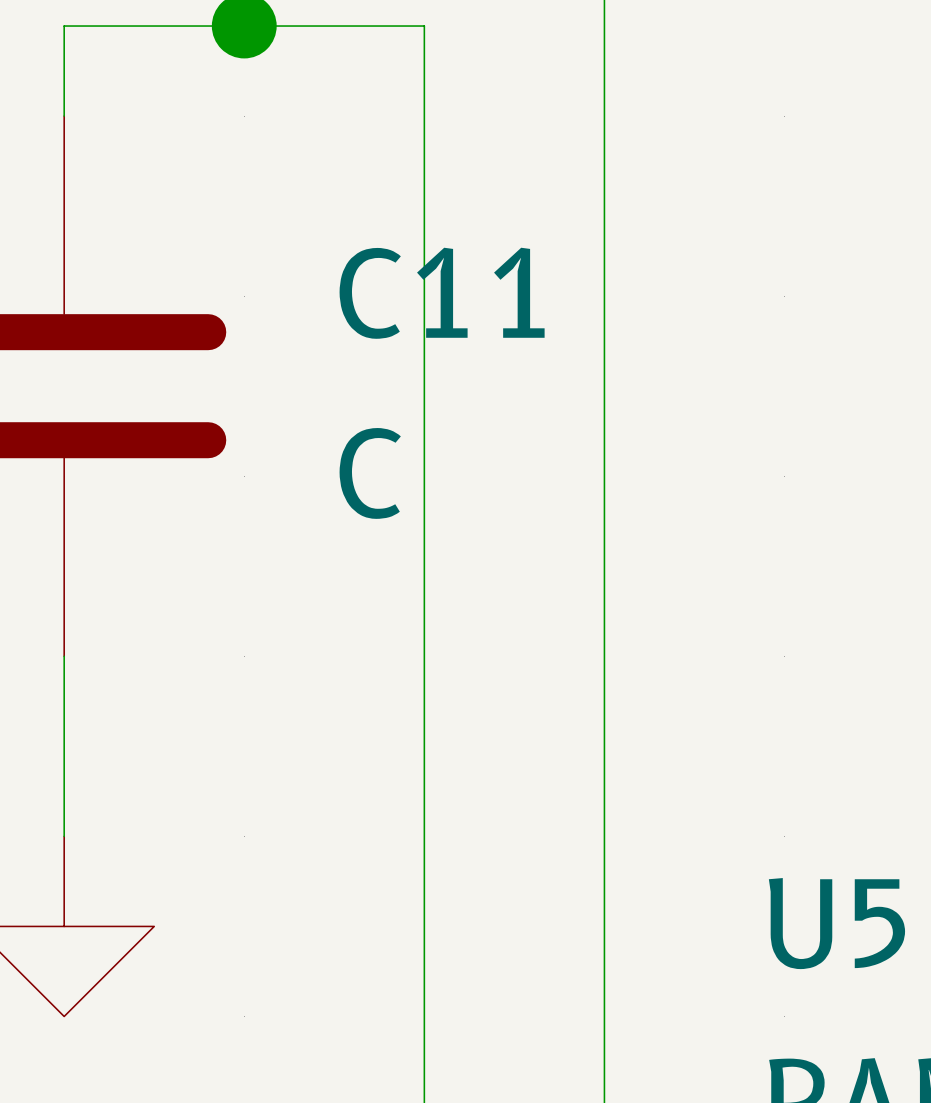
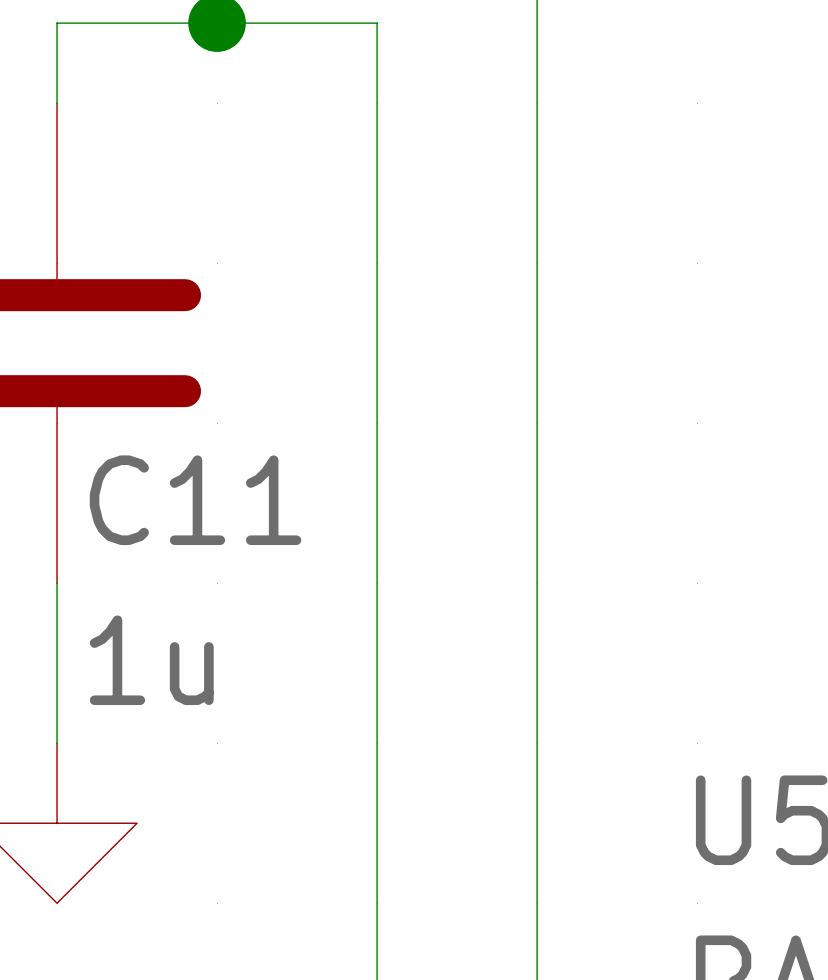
C11 name position: C11 (442, 293) -> C11 (195, 500)
C11 value: C (370, 473) -> 1u (151, 660)

